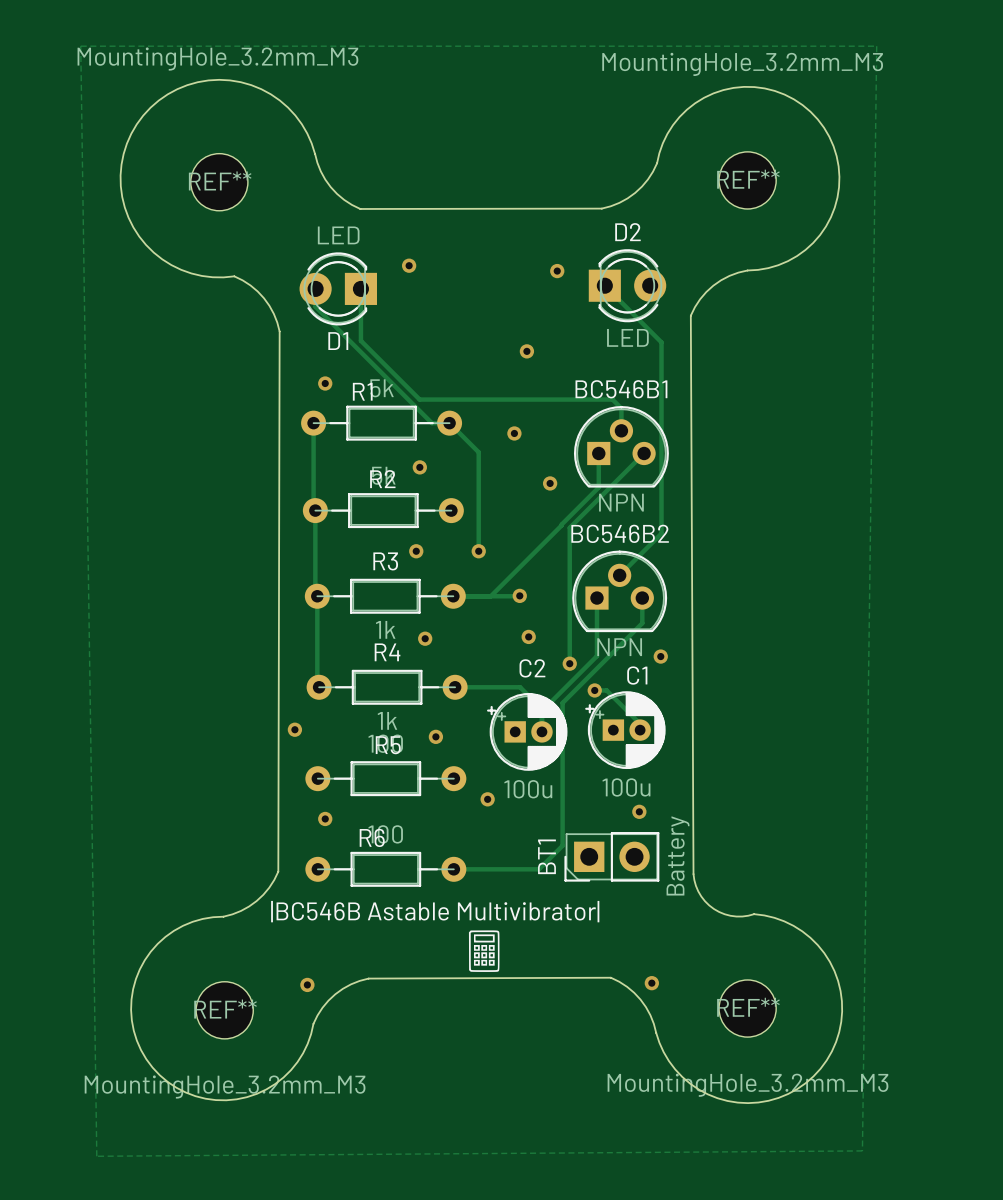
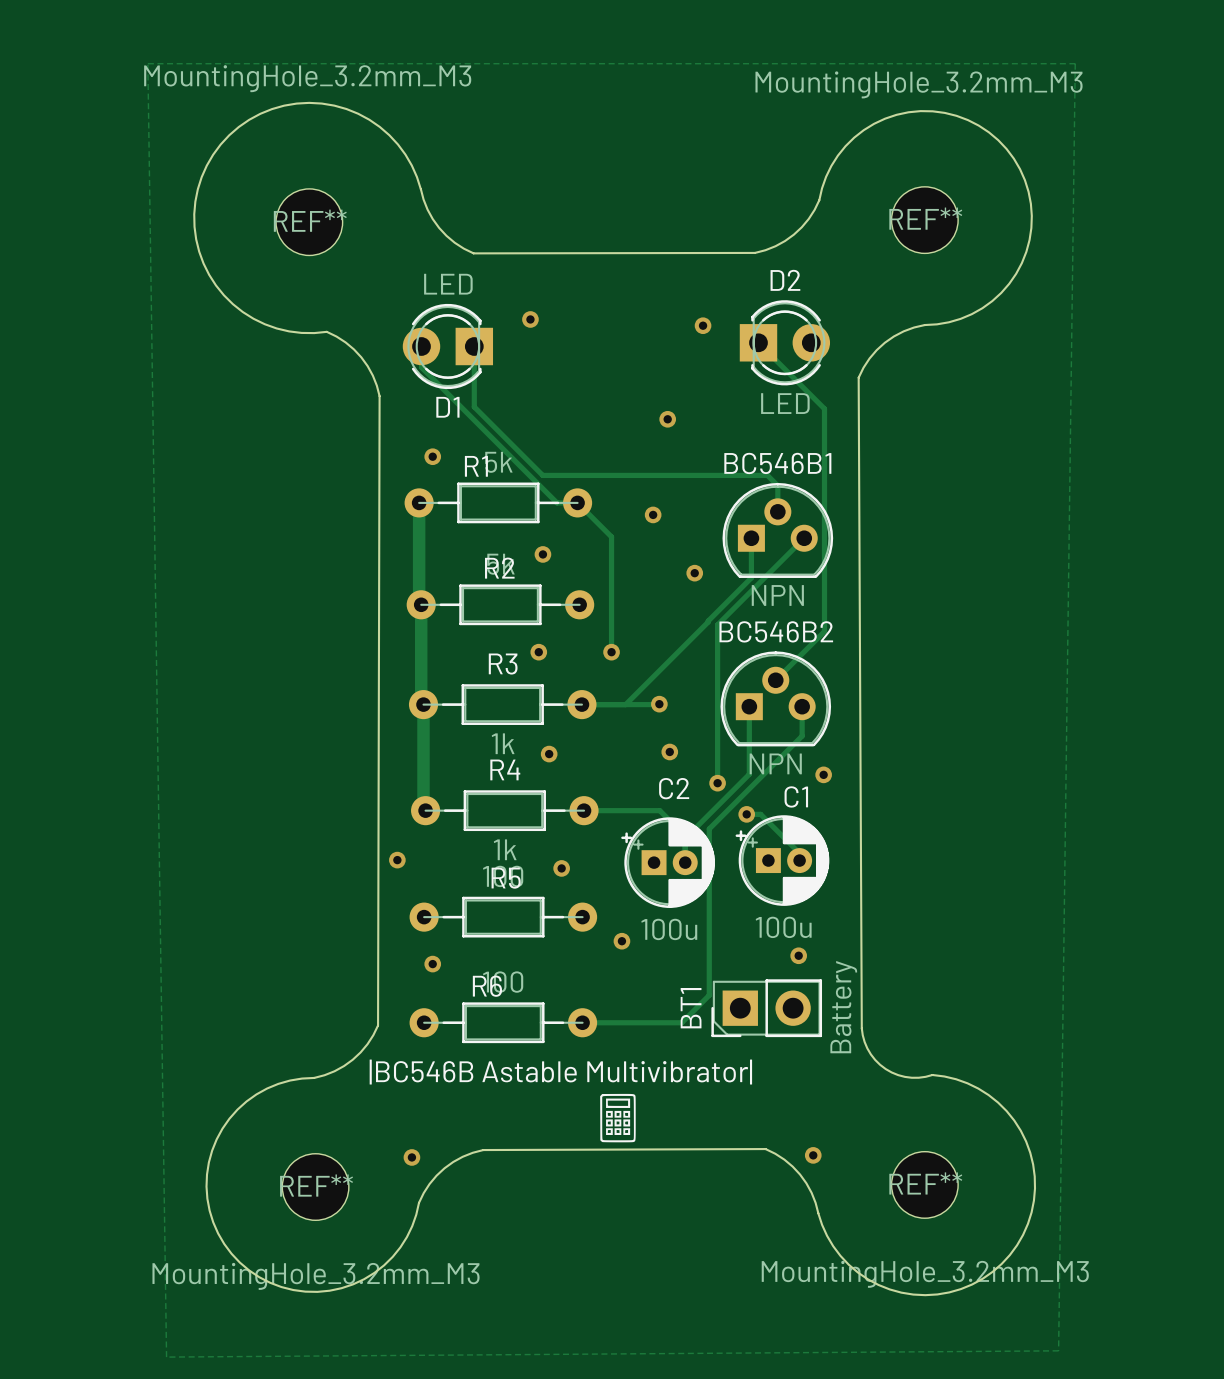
track width: thin (313, 423) (315, 594) (317, 596) (317, 685) (319, 687) -> thick (419, 502) (421, 702) (423, 704) (423, 808) (425, 810)

